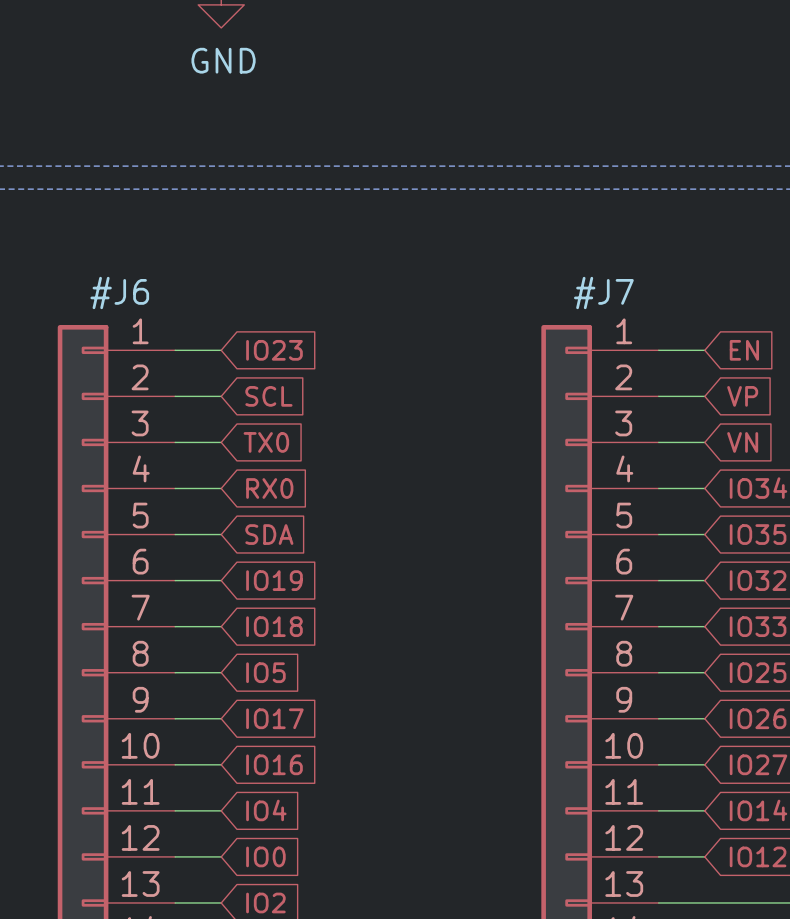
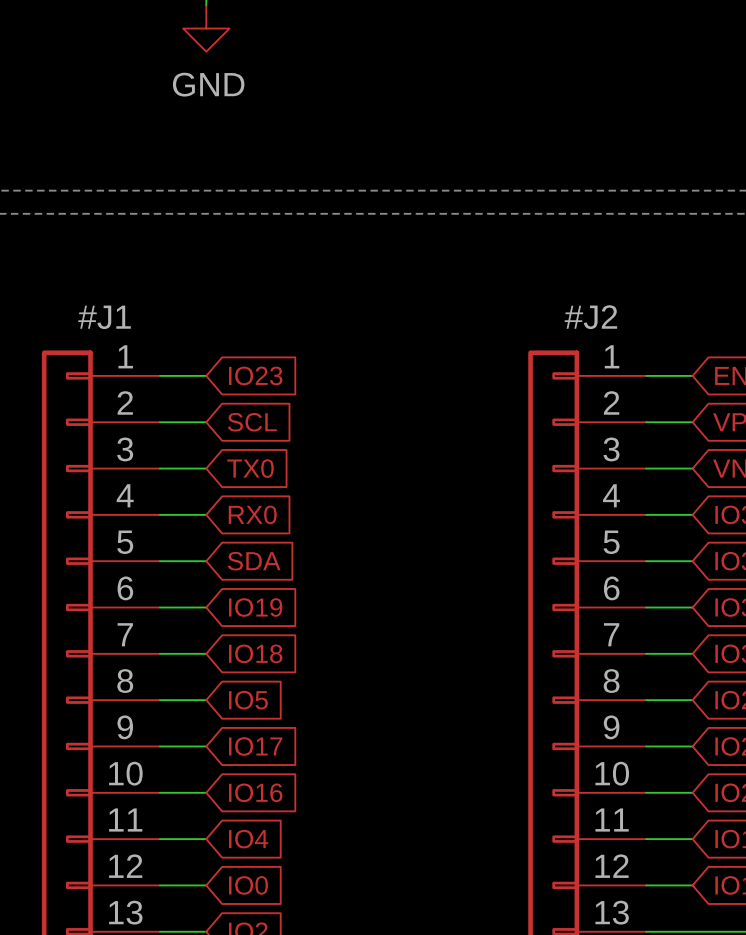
#J6 name: #J6 (119, 292) -> #J1 (104, 317)
#J7 name: #J7 (603, 292) -> #J2 (590, 317)

